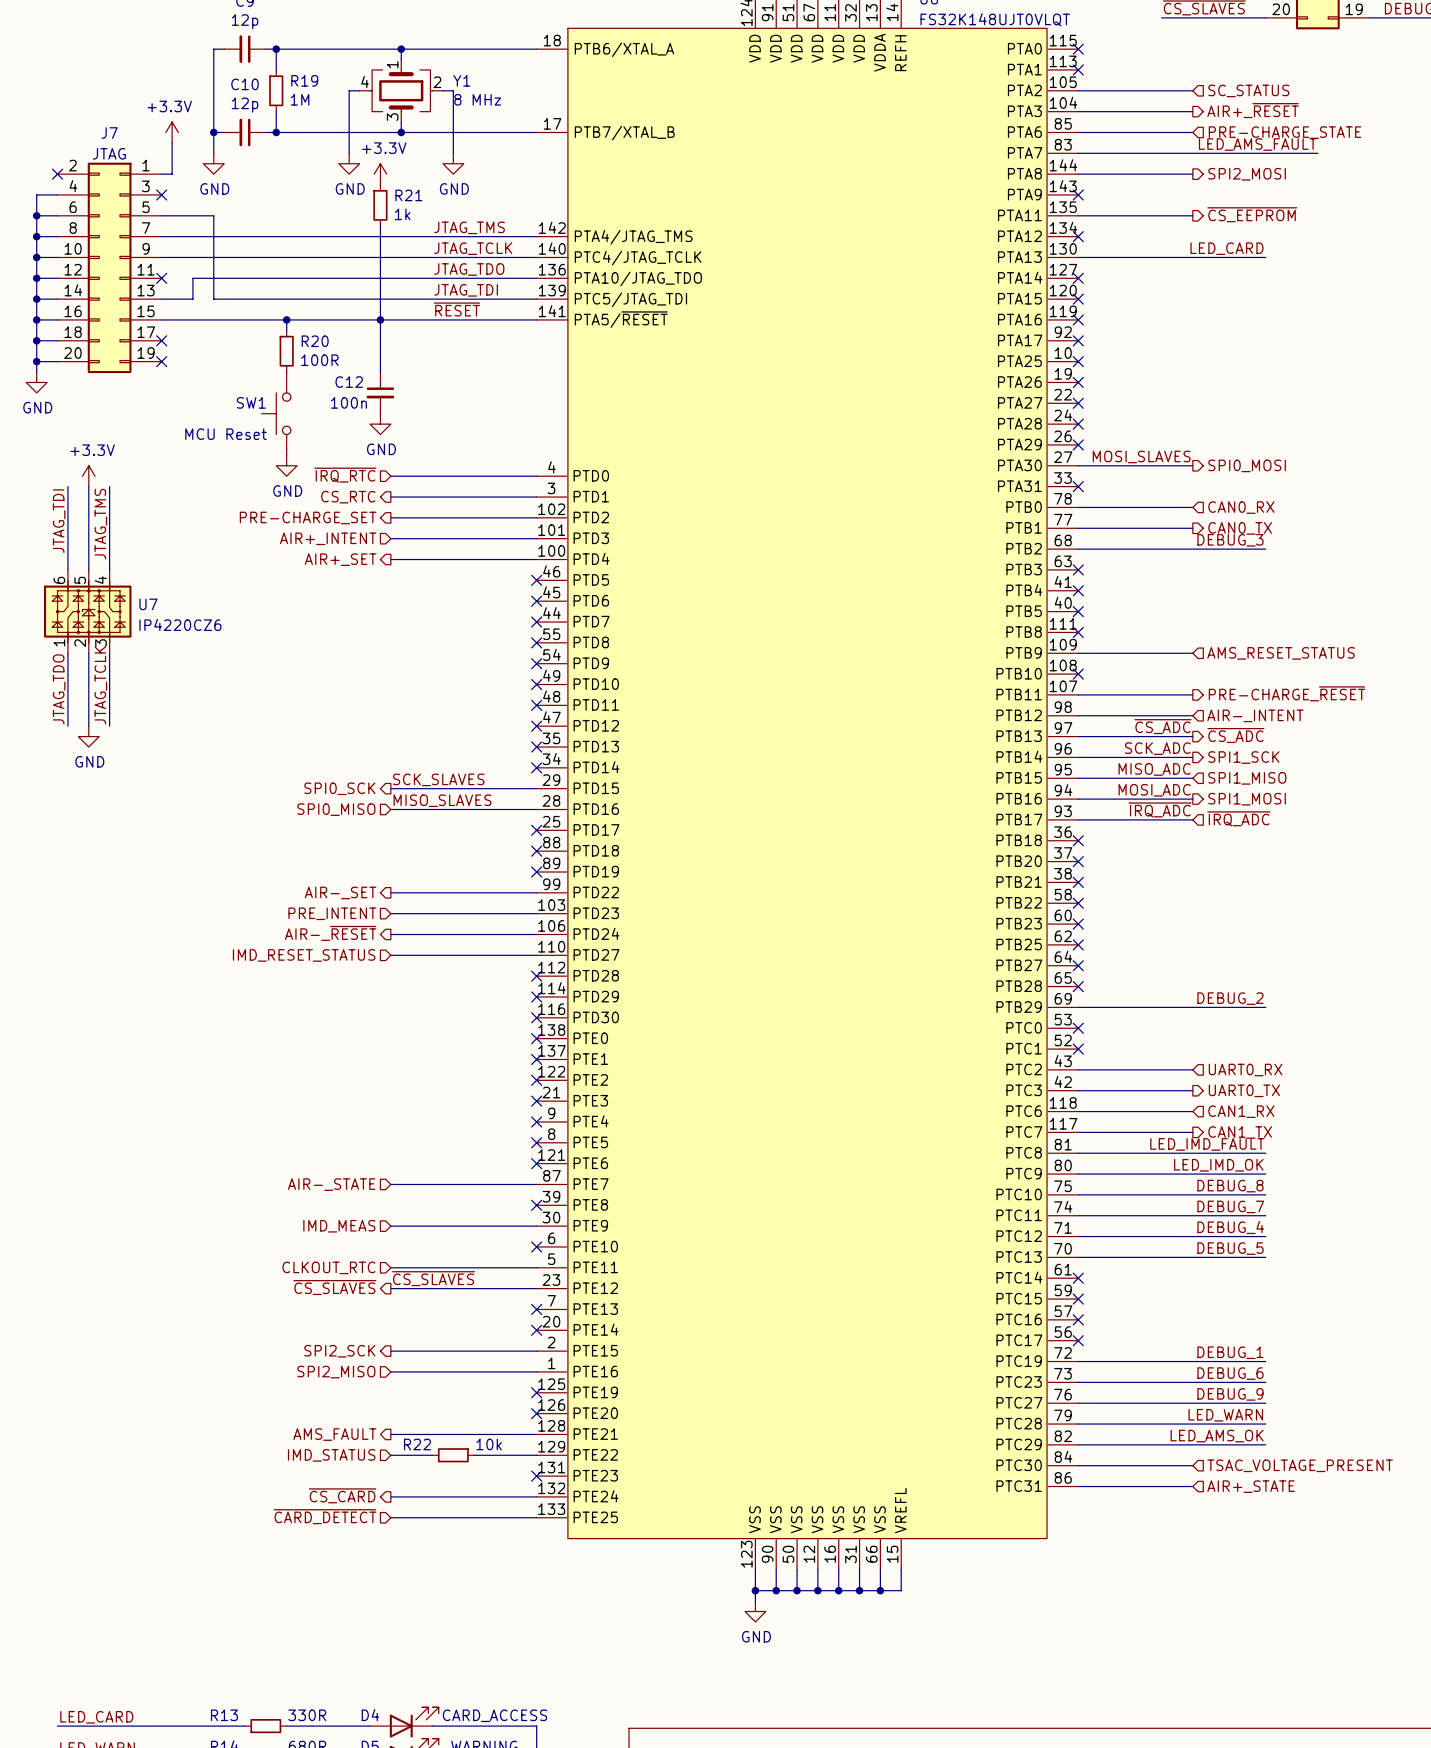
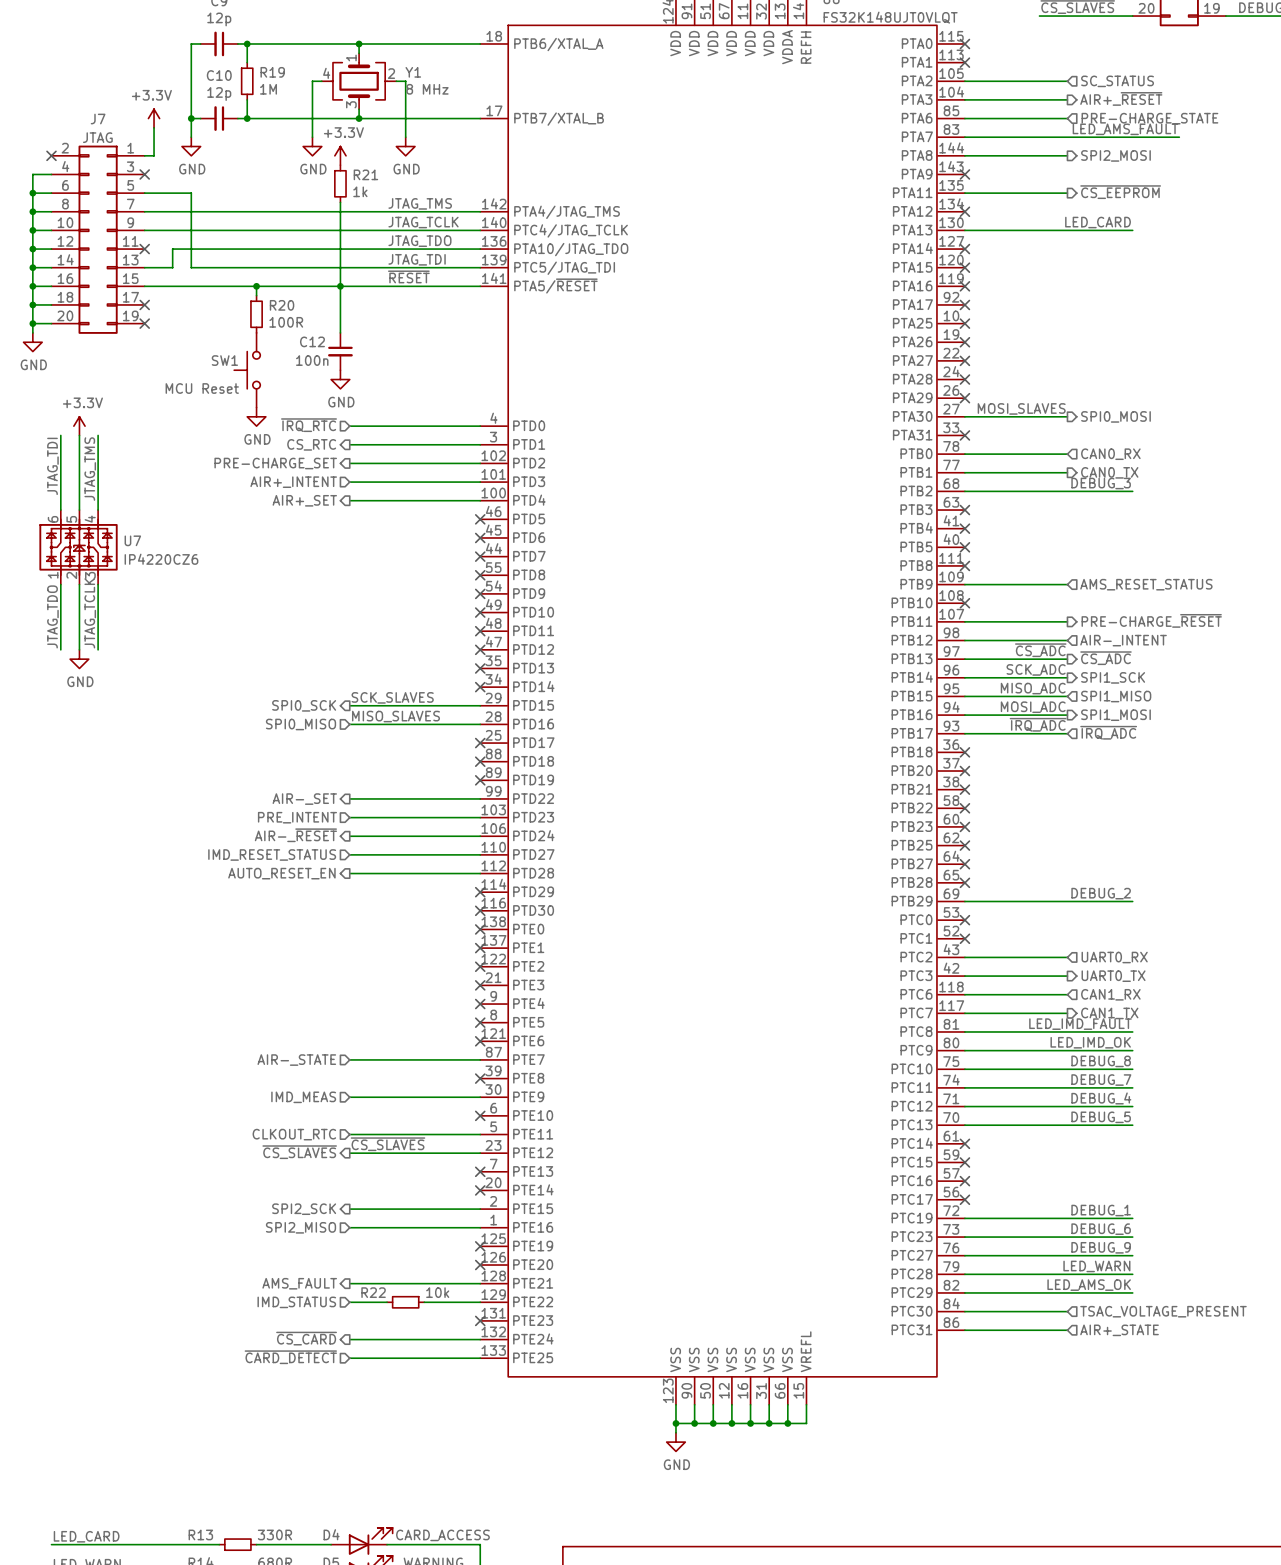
hierarchical label: none -> AUTO_RESET_EN (281, 873)
wire: none -> (349, 873) (480, 873)
no-connect mark: (536, 976) -> none

